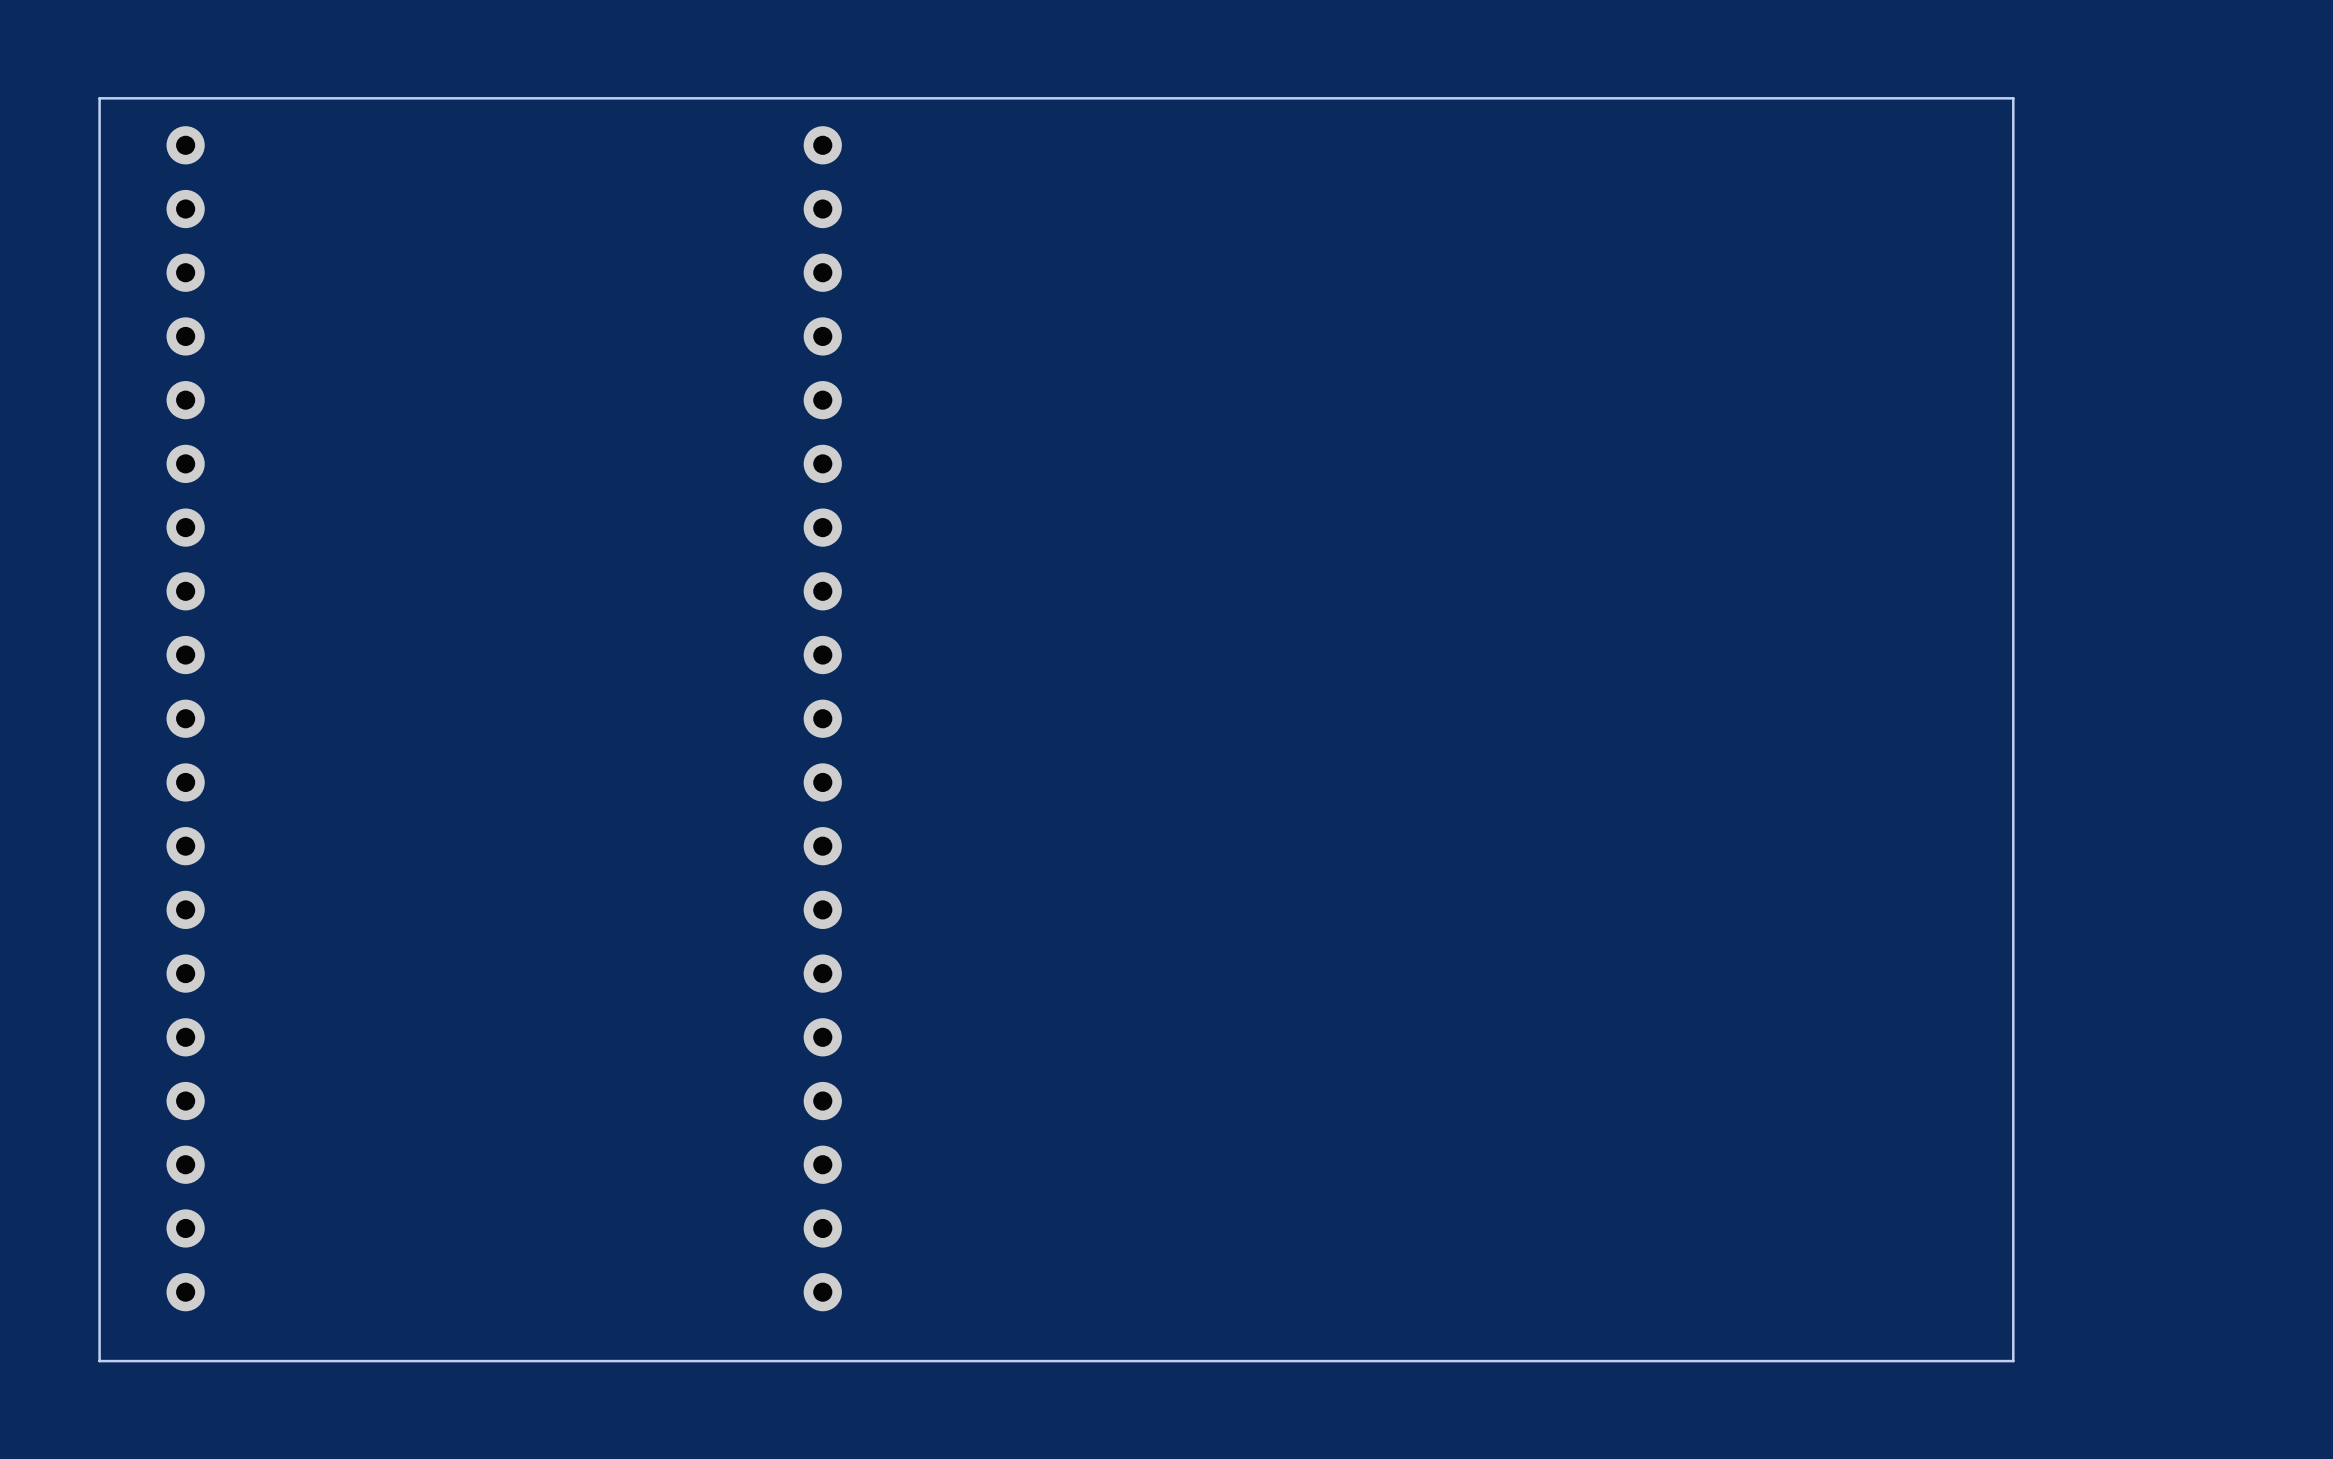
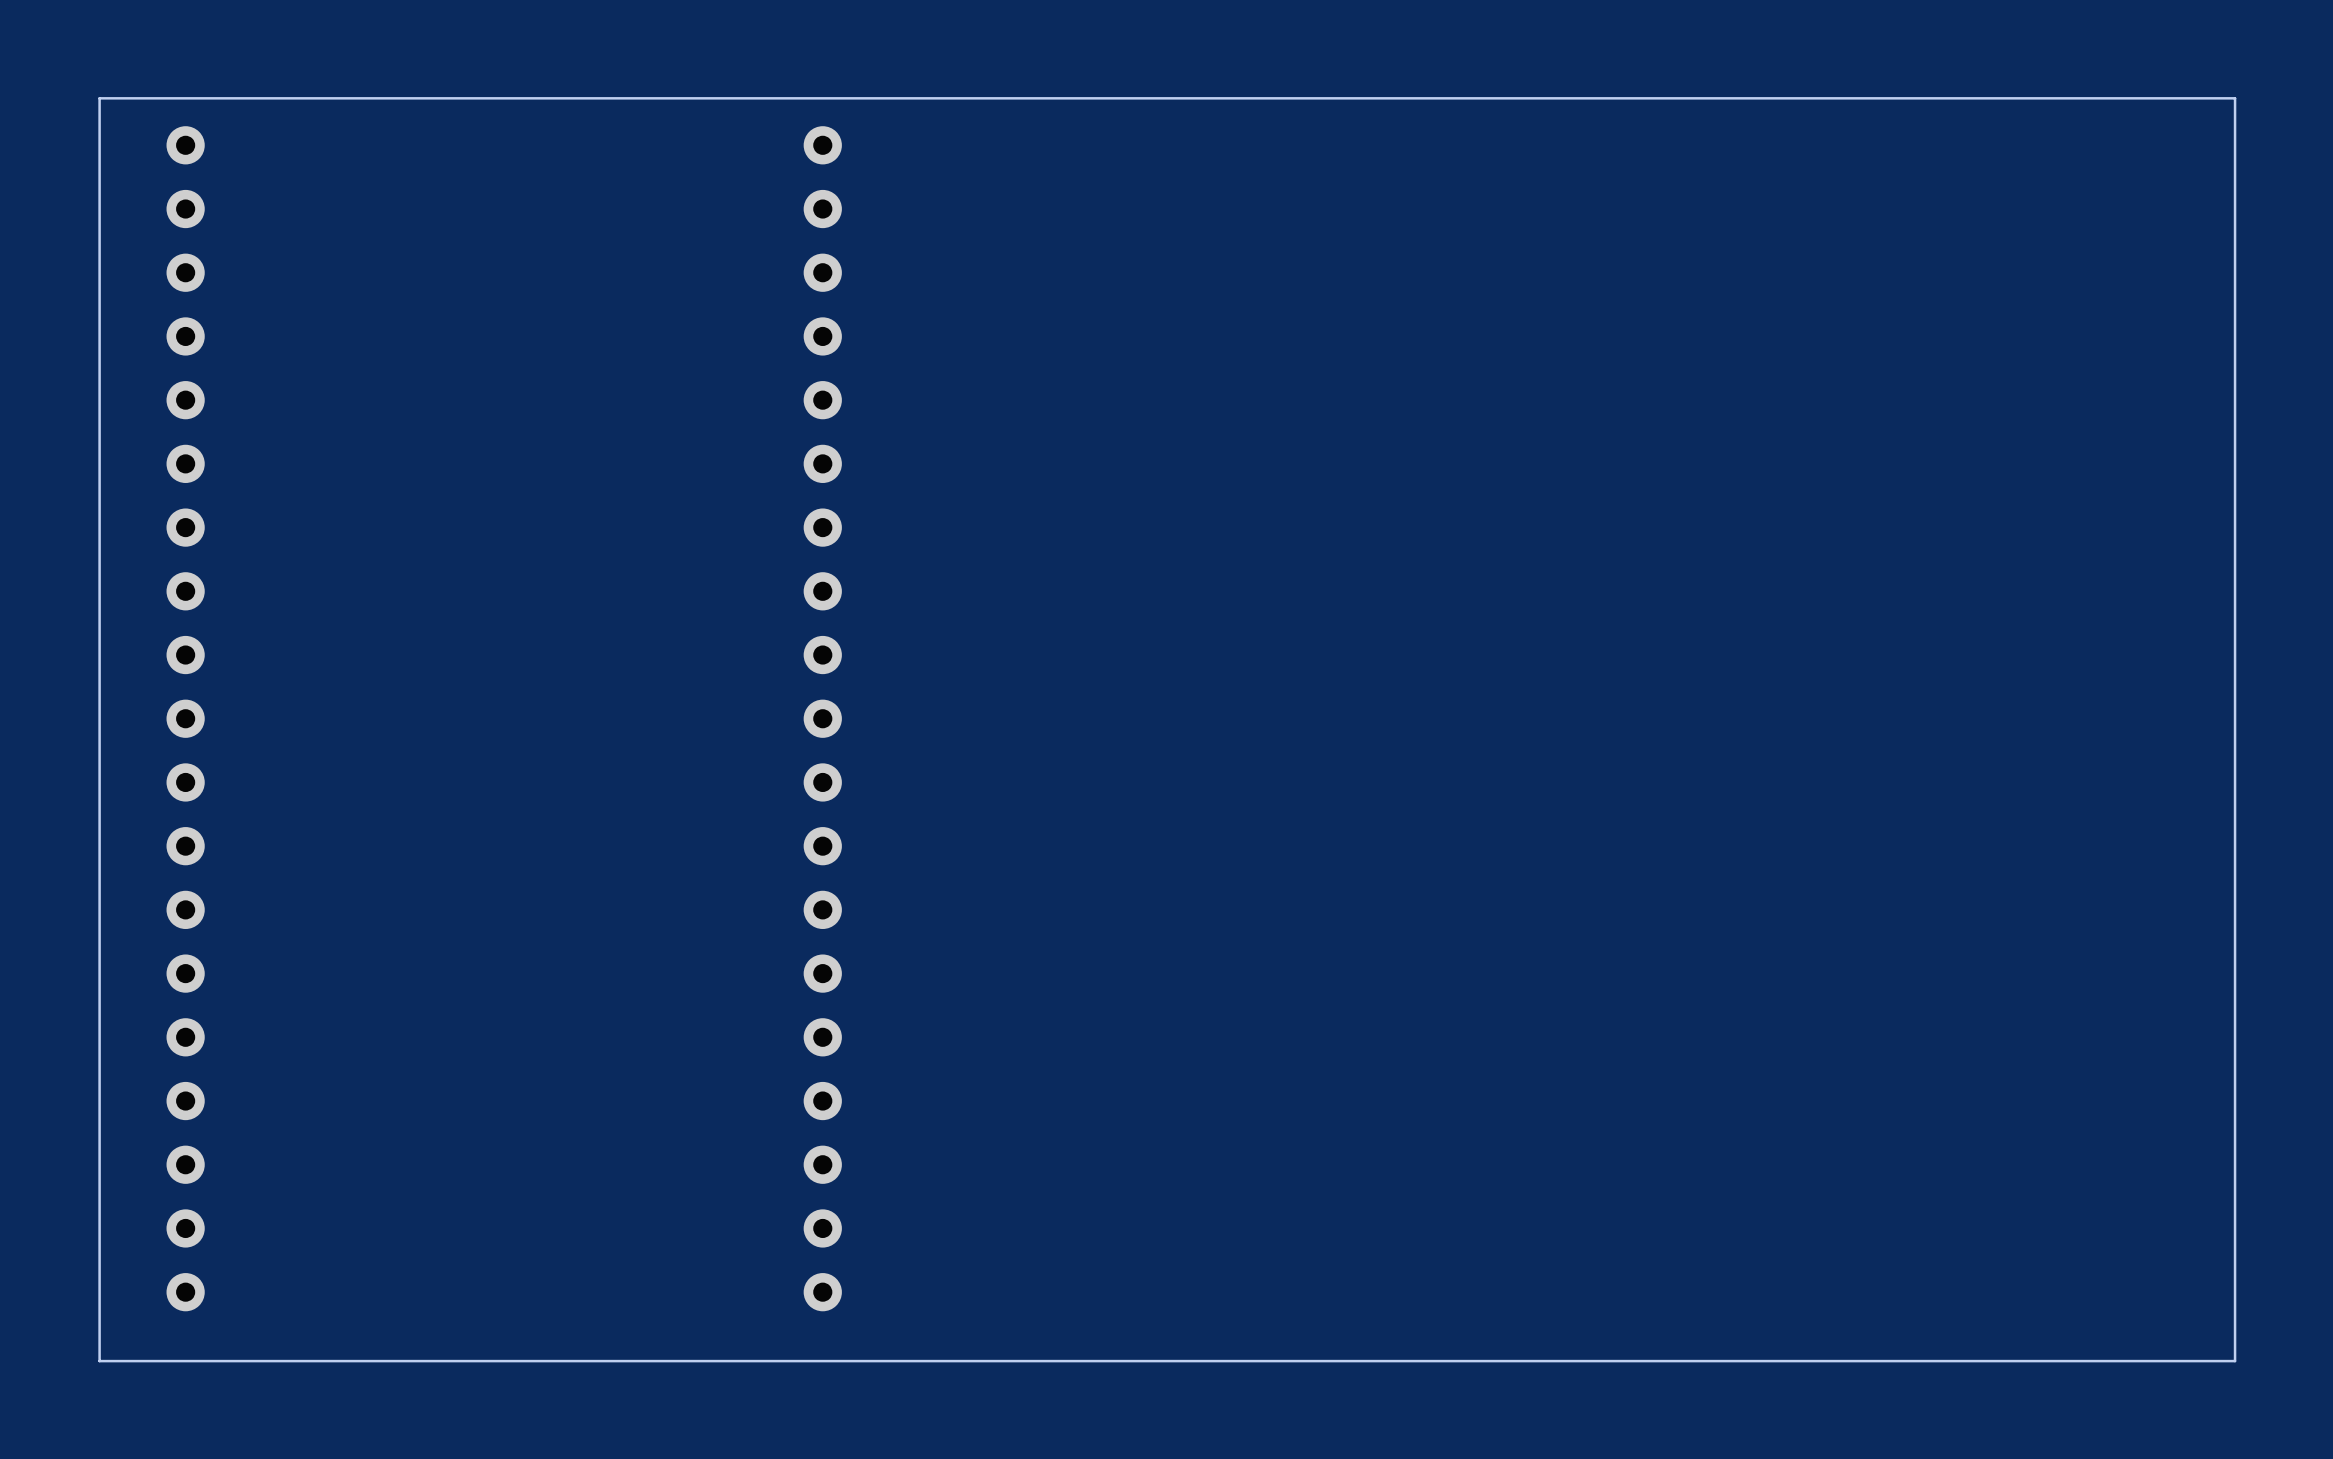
board edge: (2013, 98) (2013, 1361) -> (2013, 98) (2235, 98) (2235, 1361) (2013, 1361)

